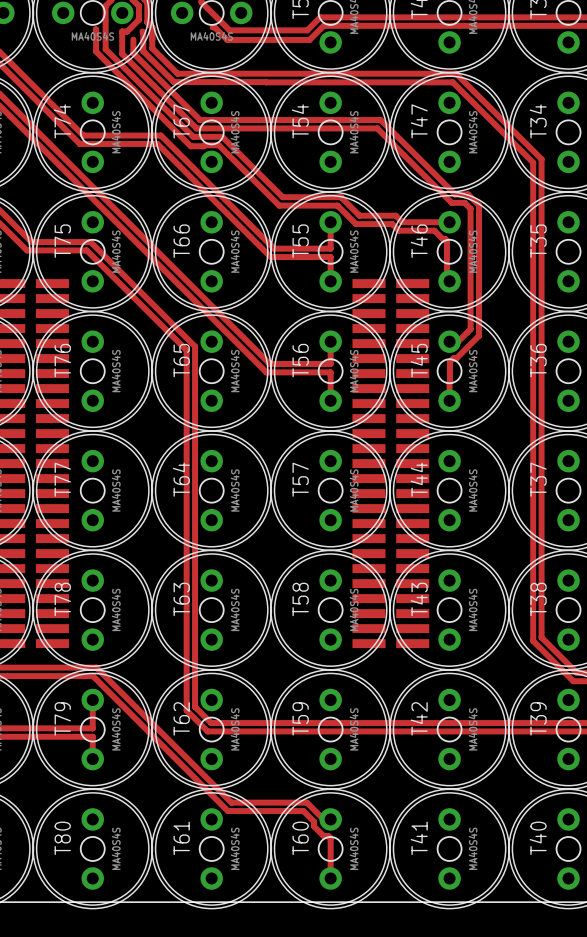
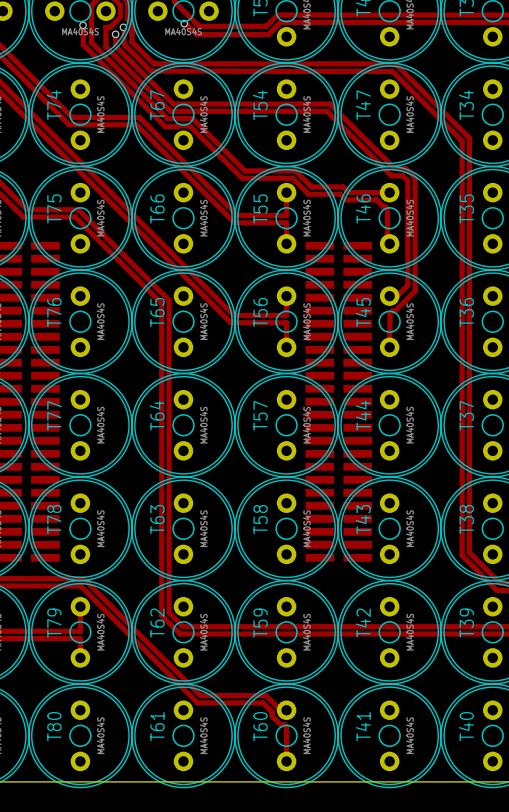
via: none -> (184, 23)
via: none -> (83, 25)
via: none -> (123, 27)
via: none -> (115, 34)

